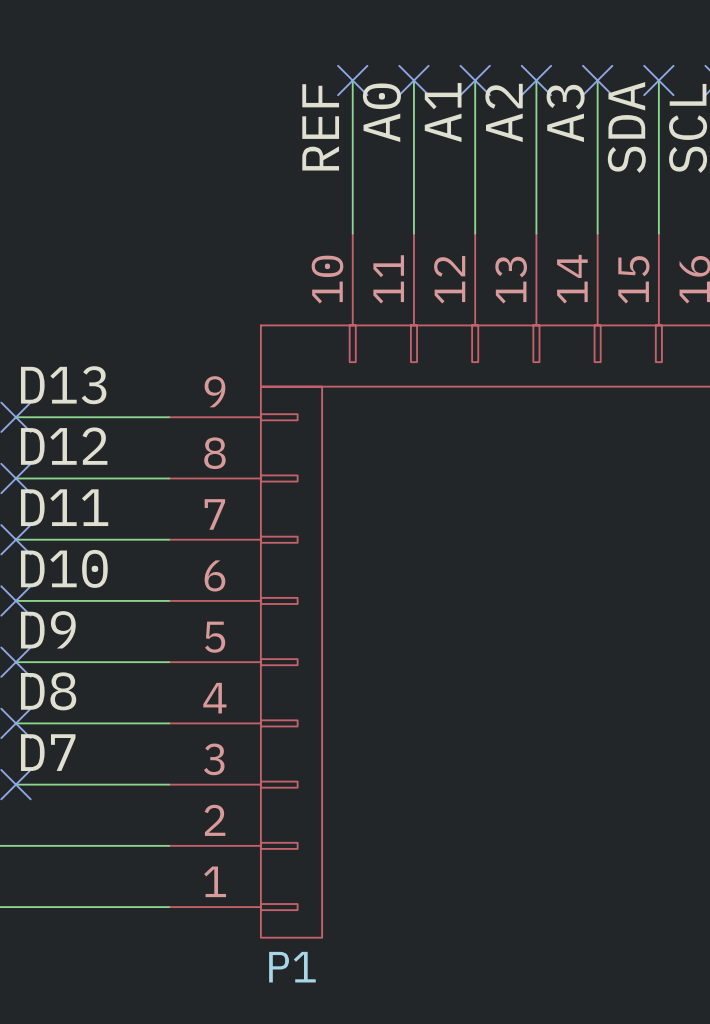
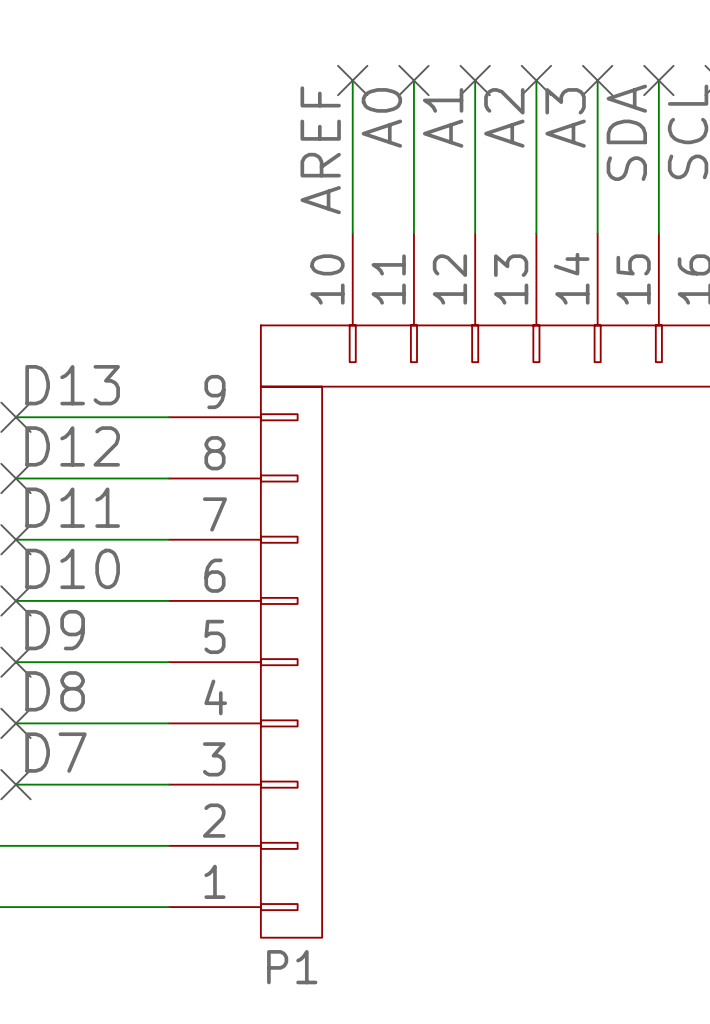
label: REF (320, 127) -> AREF (320, 150)

